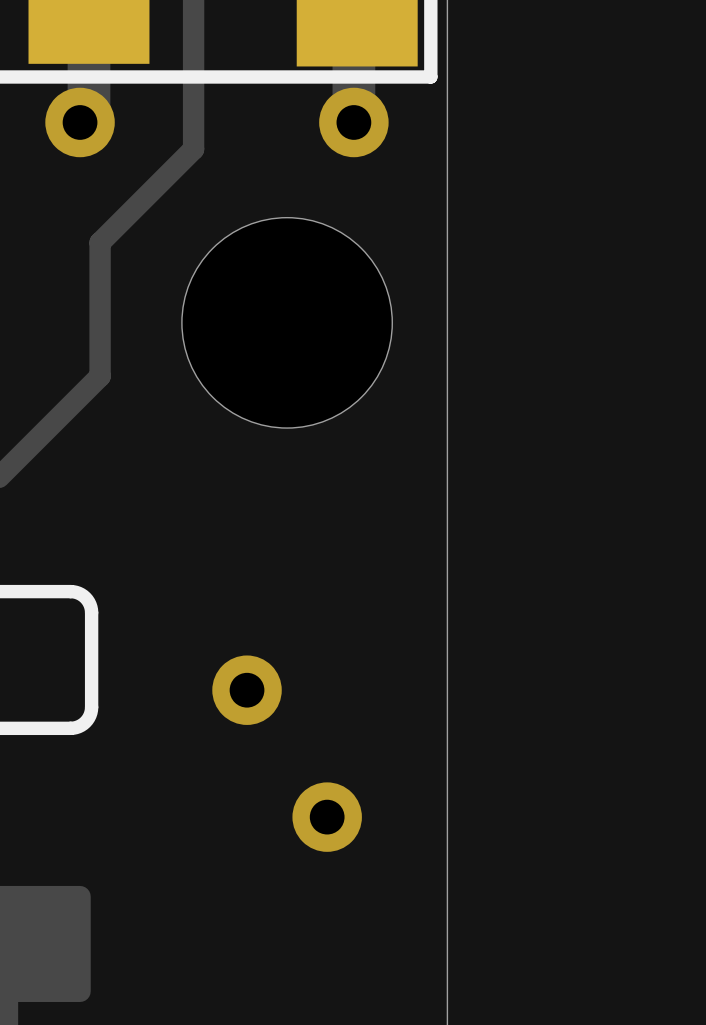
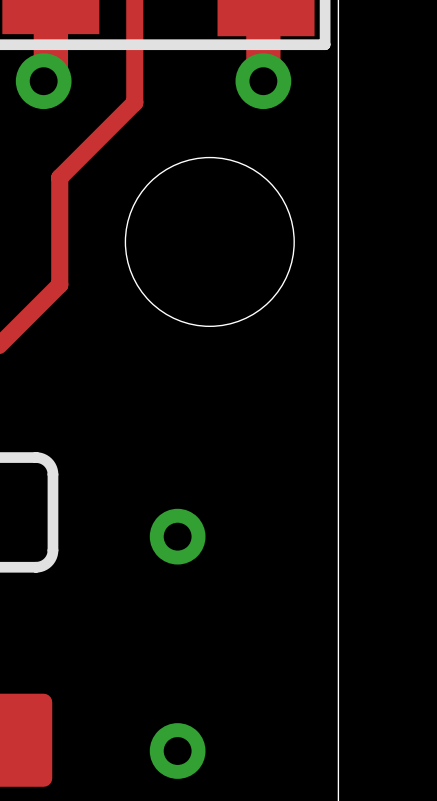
via: (327, 817) -> none
via: none -> (177, 751)

